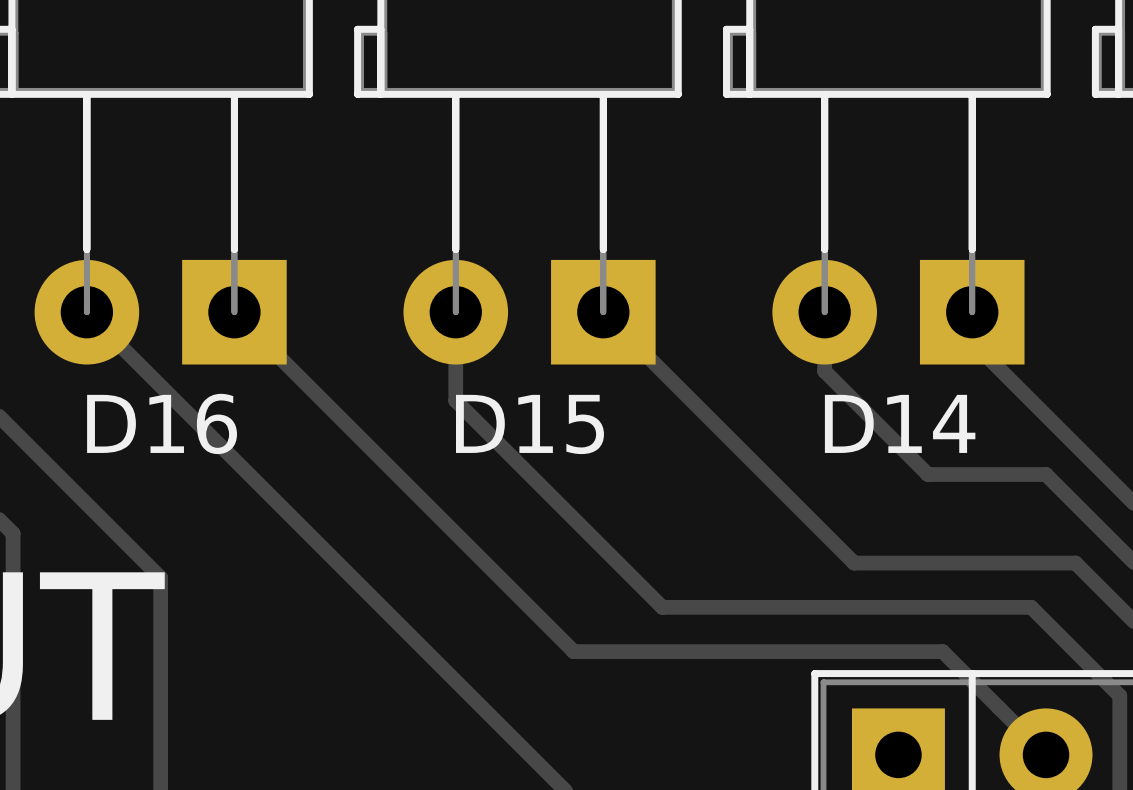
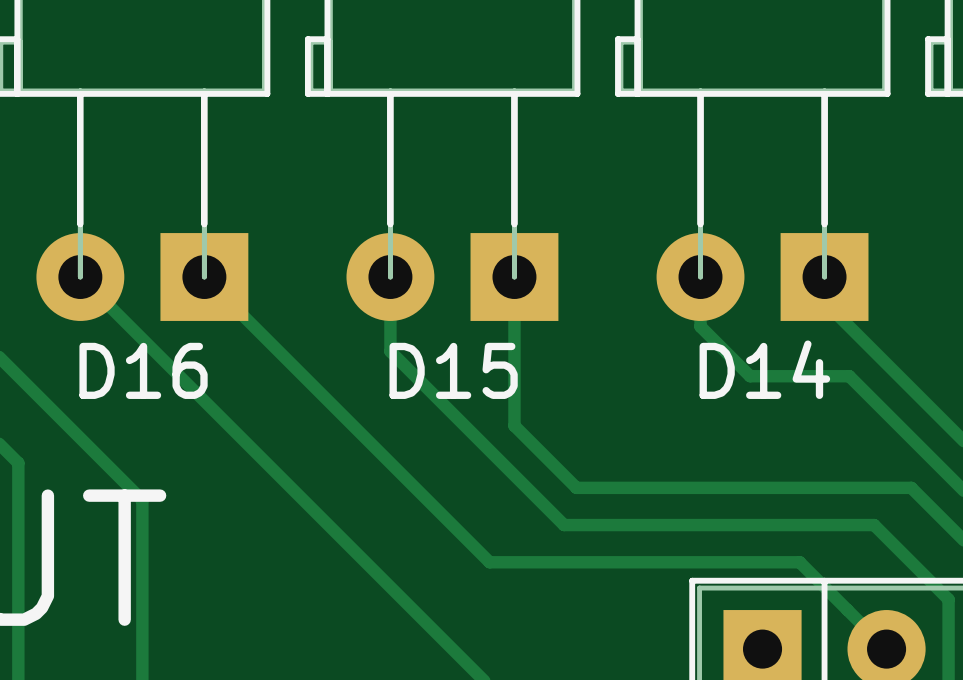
track: (603, 312) (854, 563) -> (514, 277) (514, 425) (576, 487) (725, 487)
track: (883, 430) (927, 474) (1046, 474) -> (750, 376) (849, 376) (886, 413)

